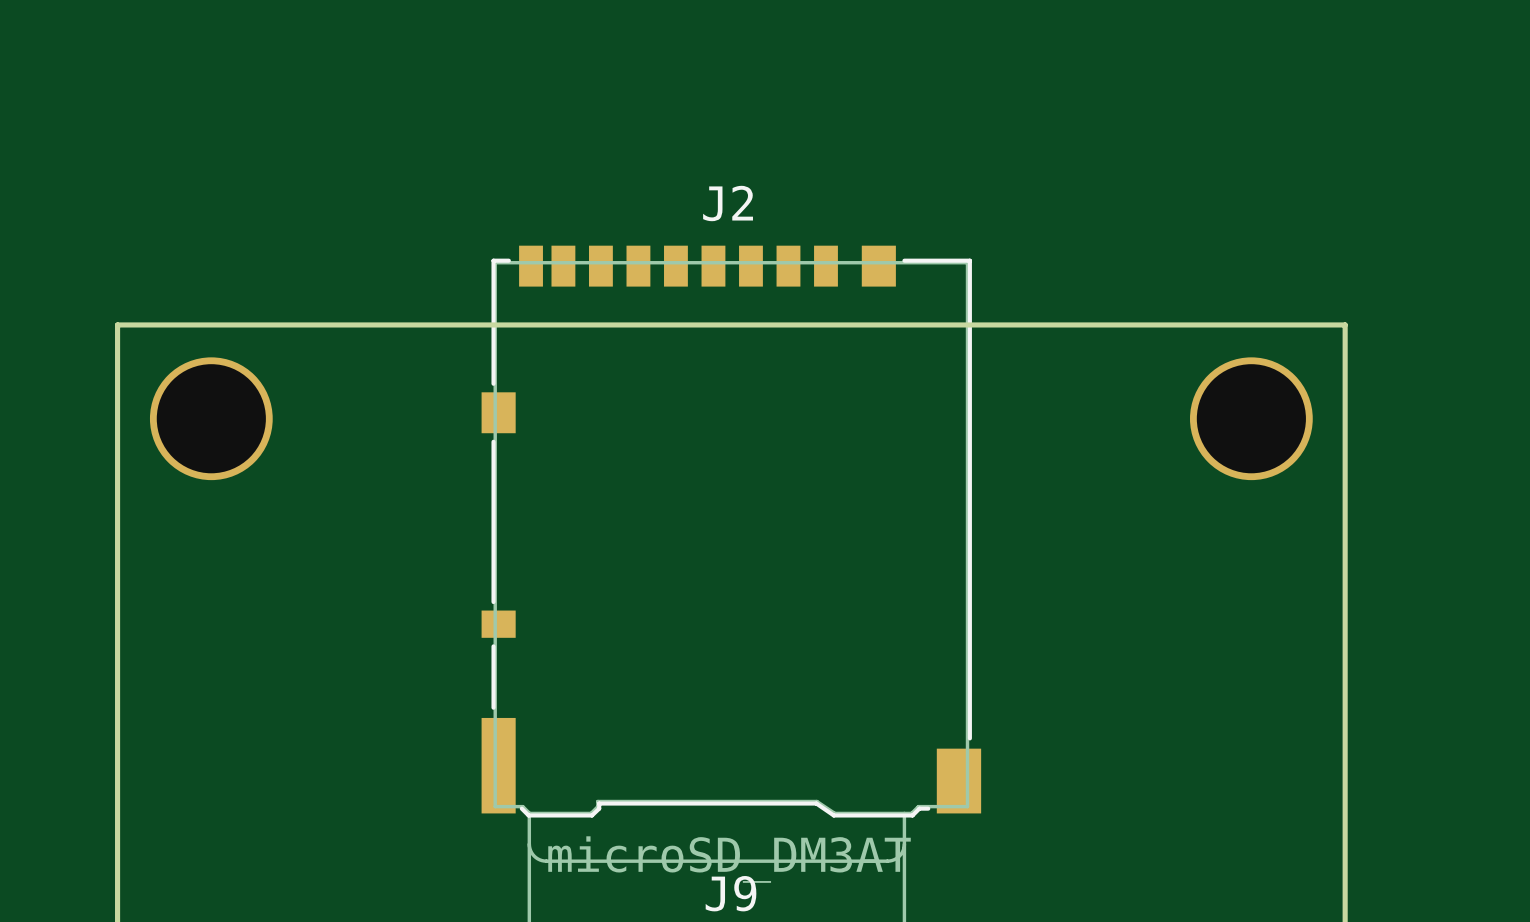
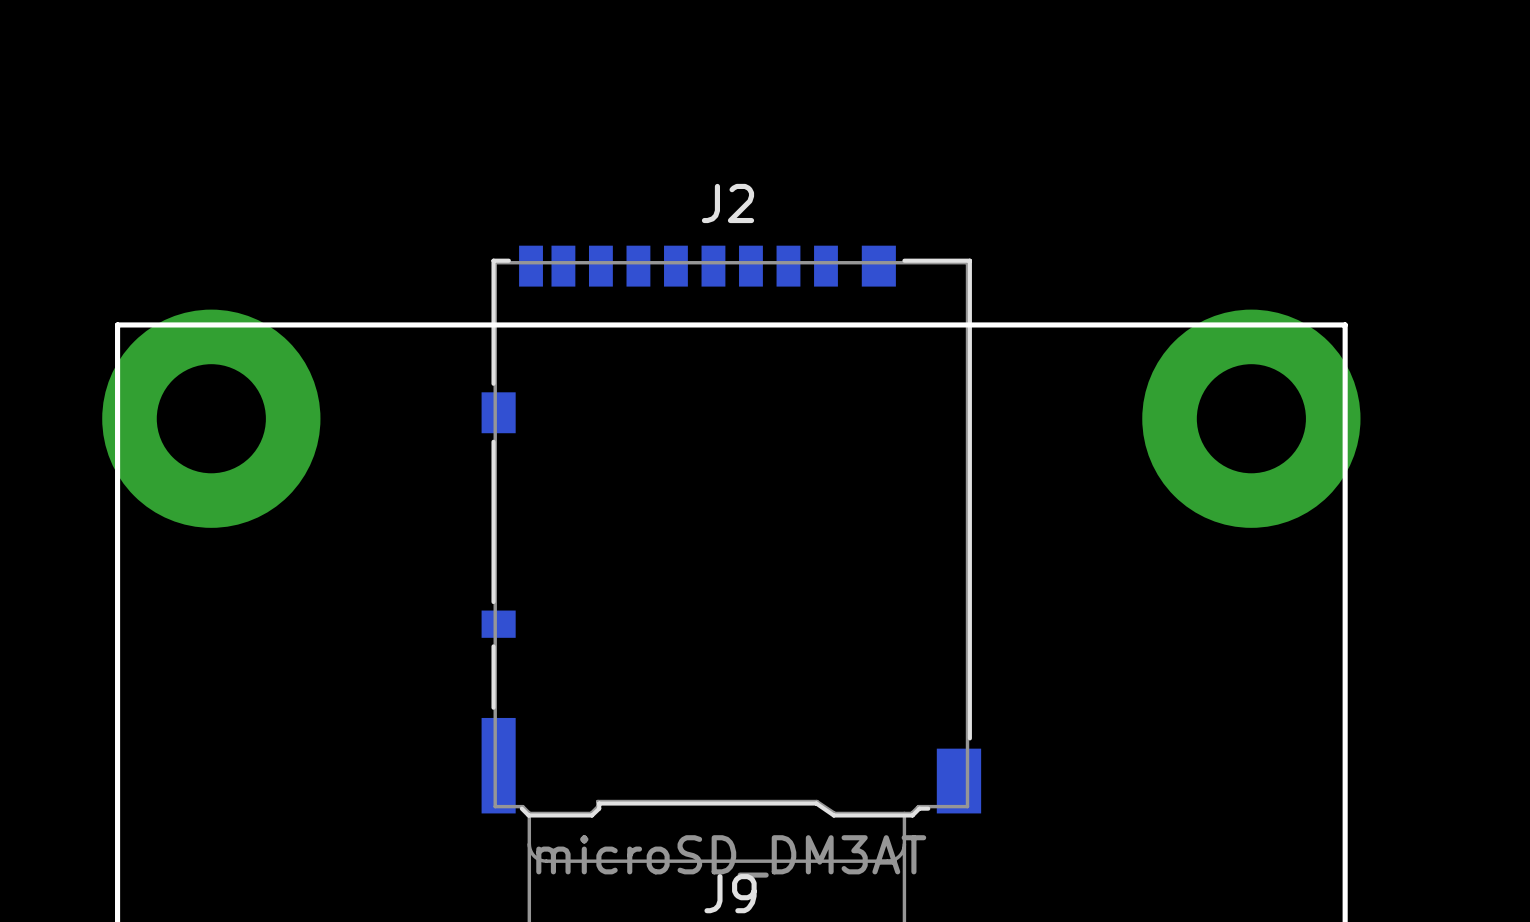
part footprint: [149, 357, 273, 481] -> [102, 309, 321, 528]
part footprint: [1190, 357, 1313, 481] -> [1142, 309, 1361, 528]

